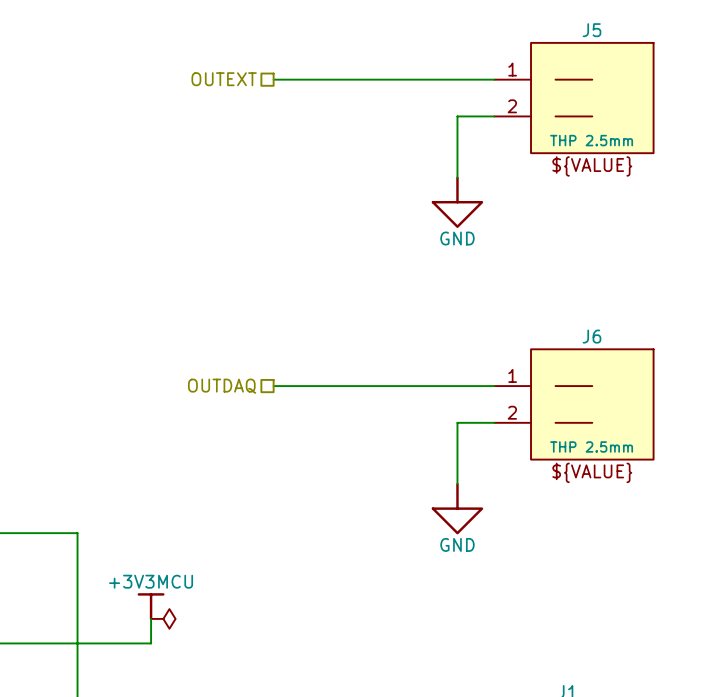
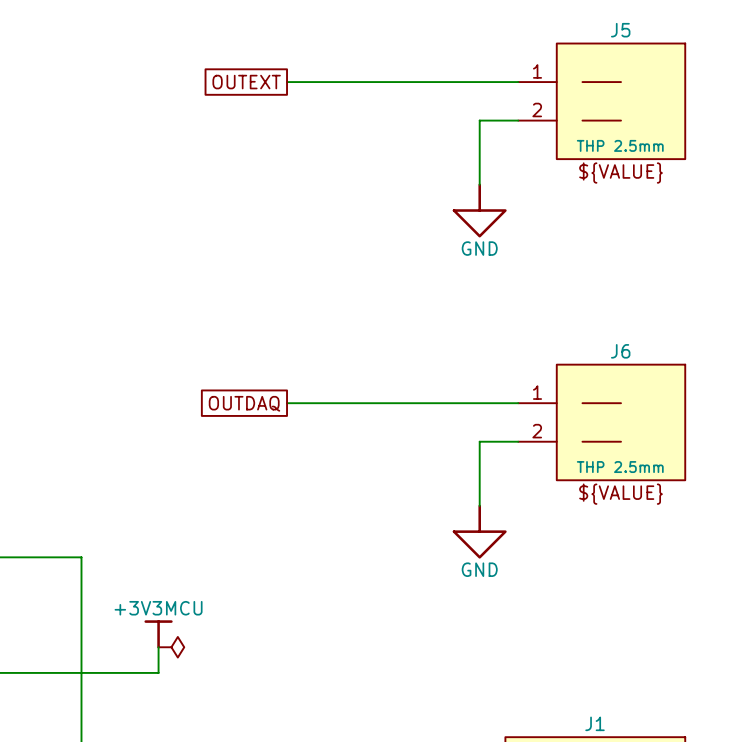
hierarchical label: OUTEXT (224, 79) -> none
global label: none -> OUTEXT (246, 82)
hierarchical label: OUTDAQ (222, 386) -> none
global label: none -> OUTDAQ (244, 403)

